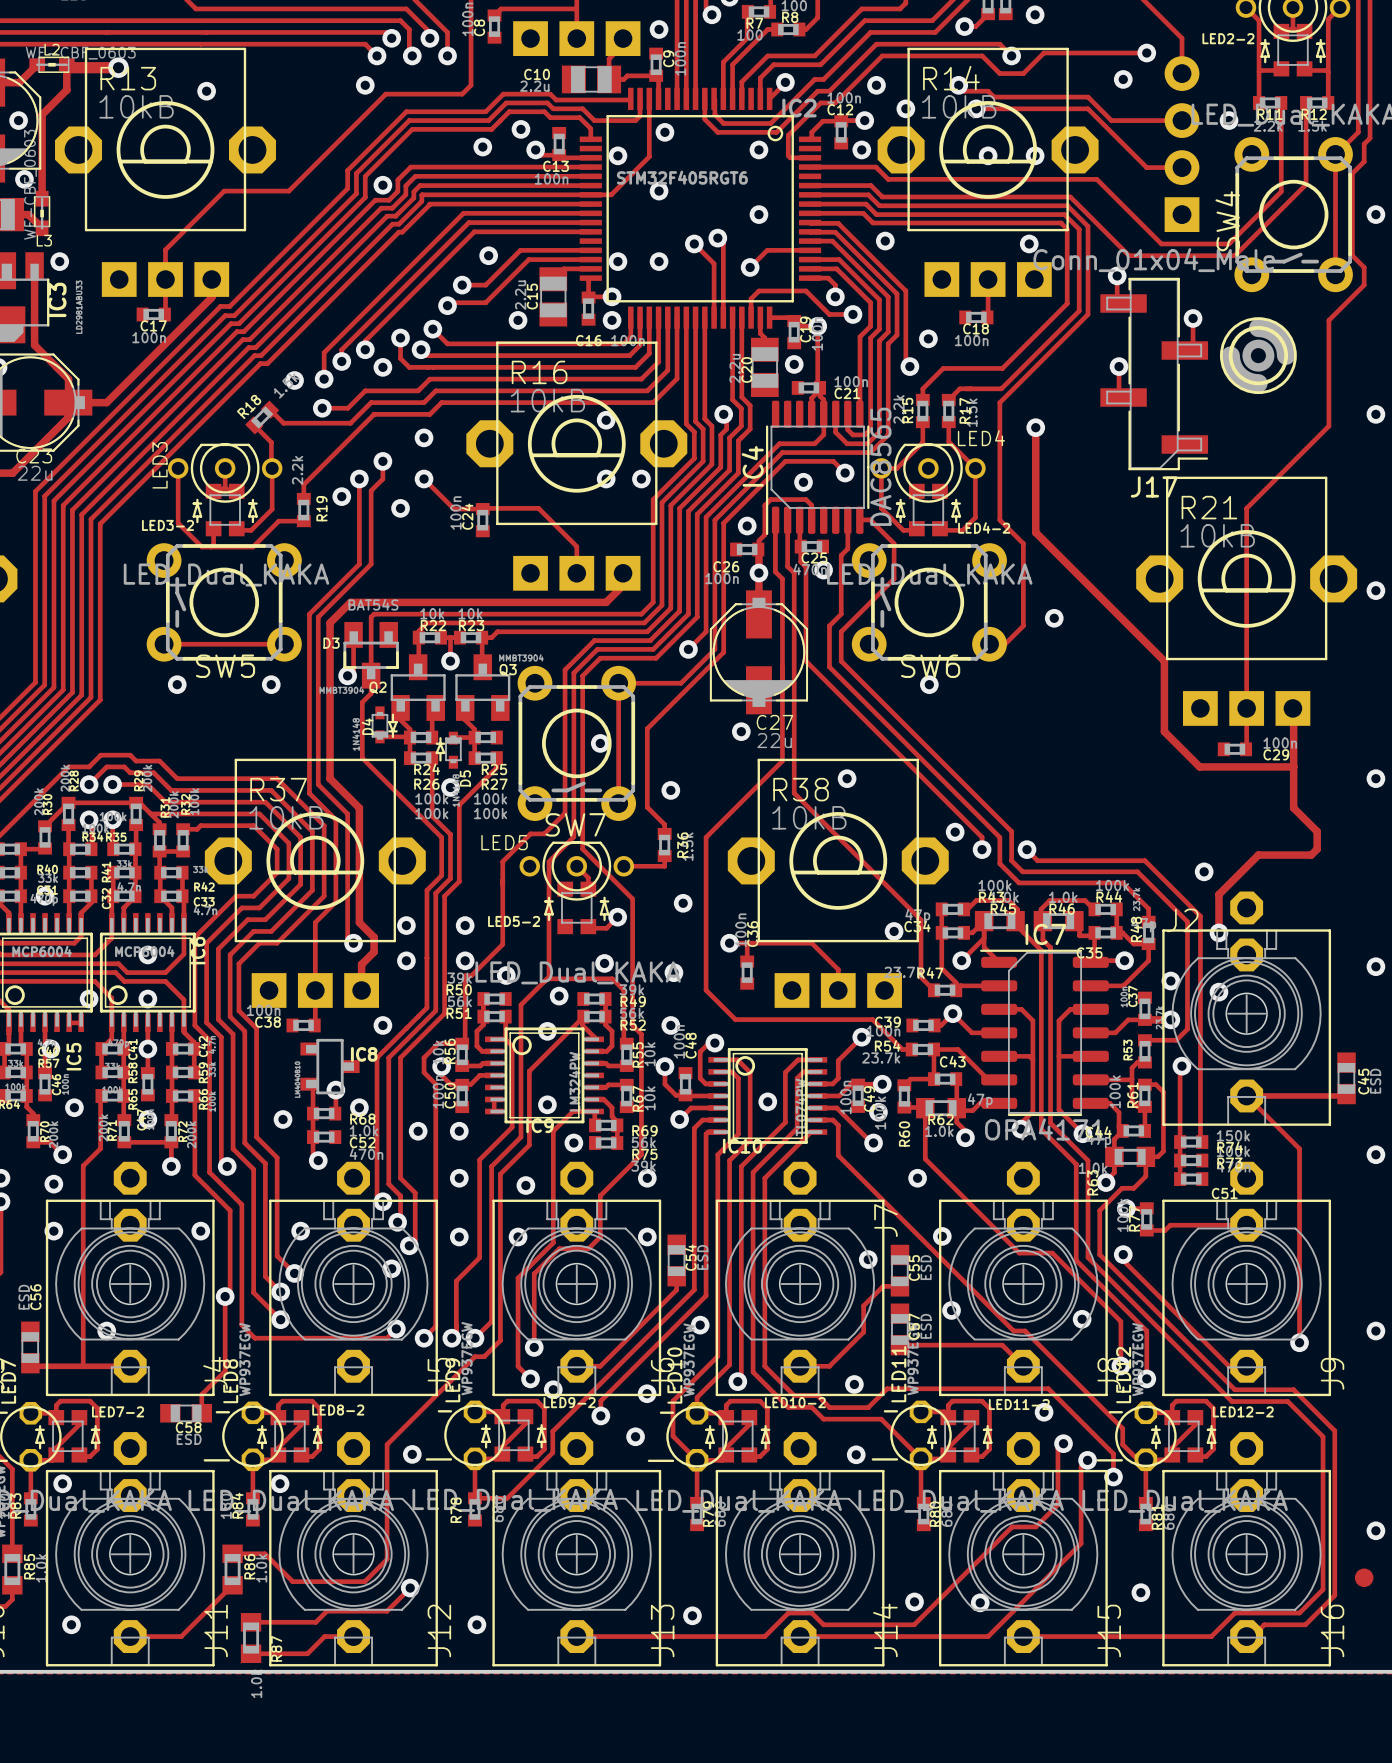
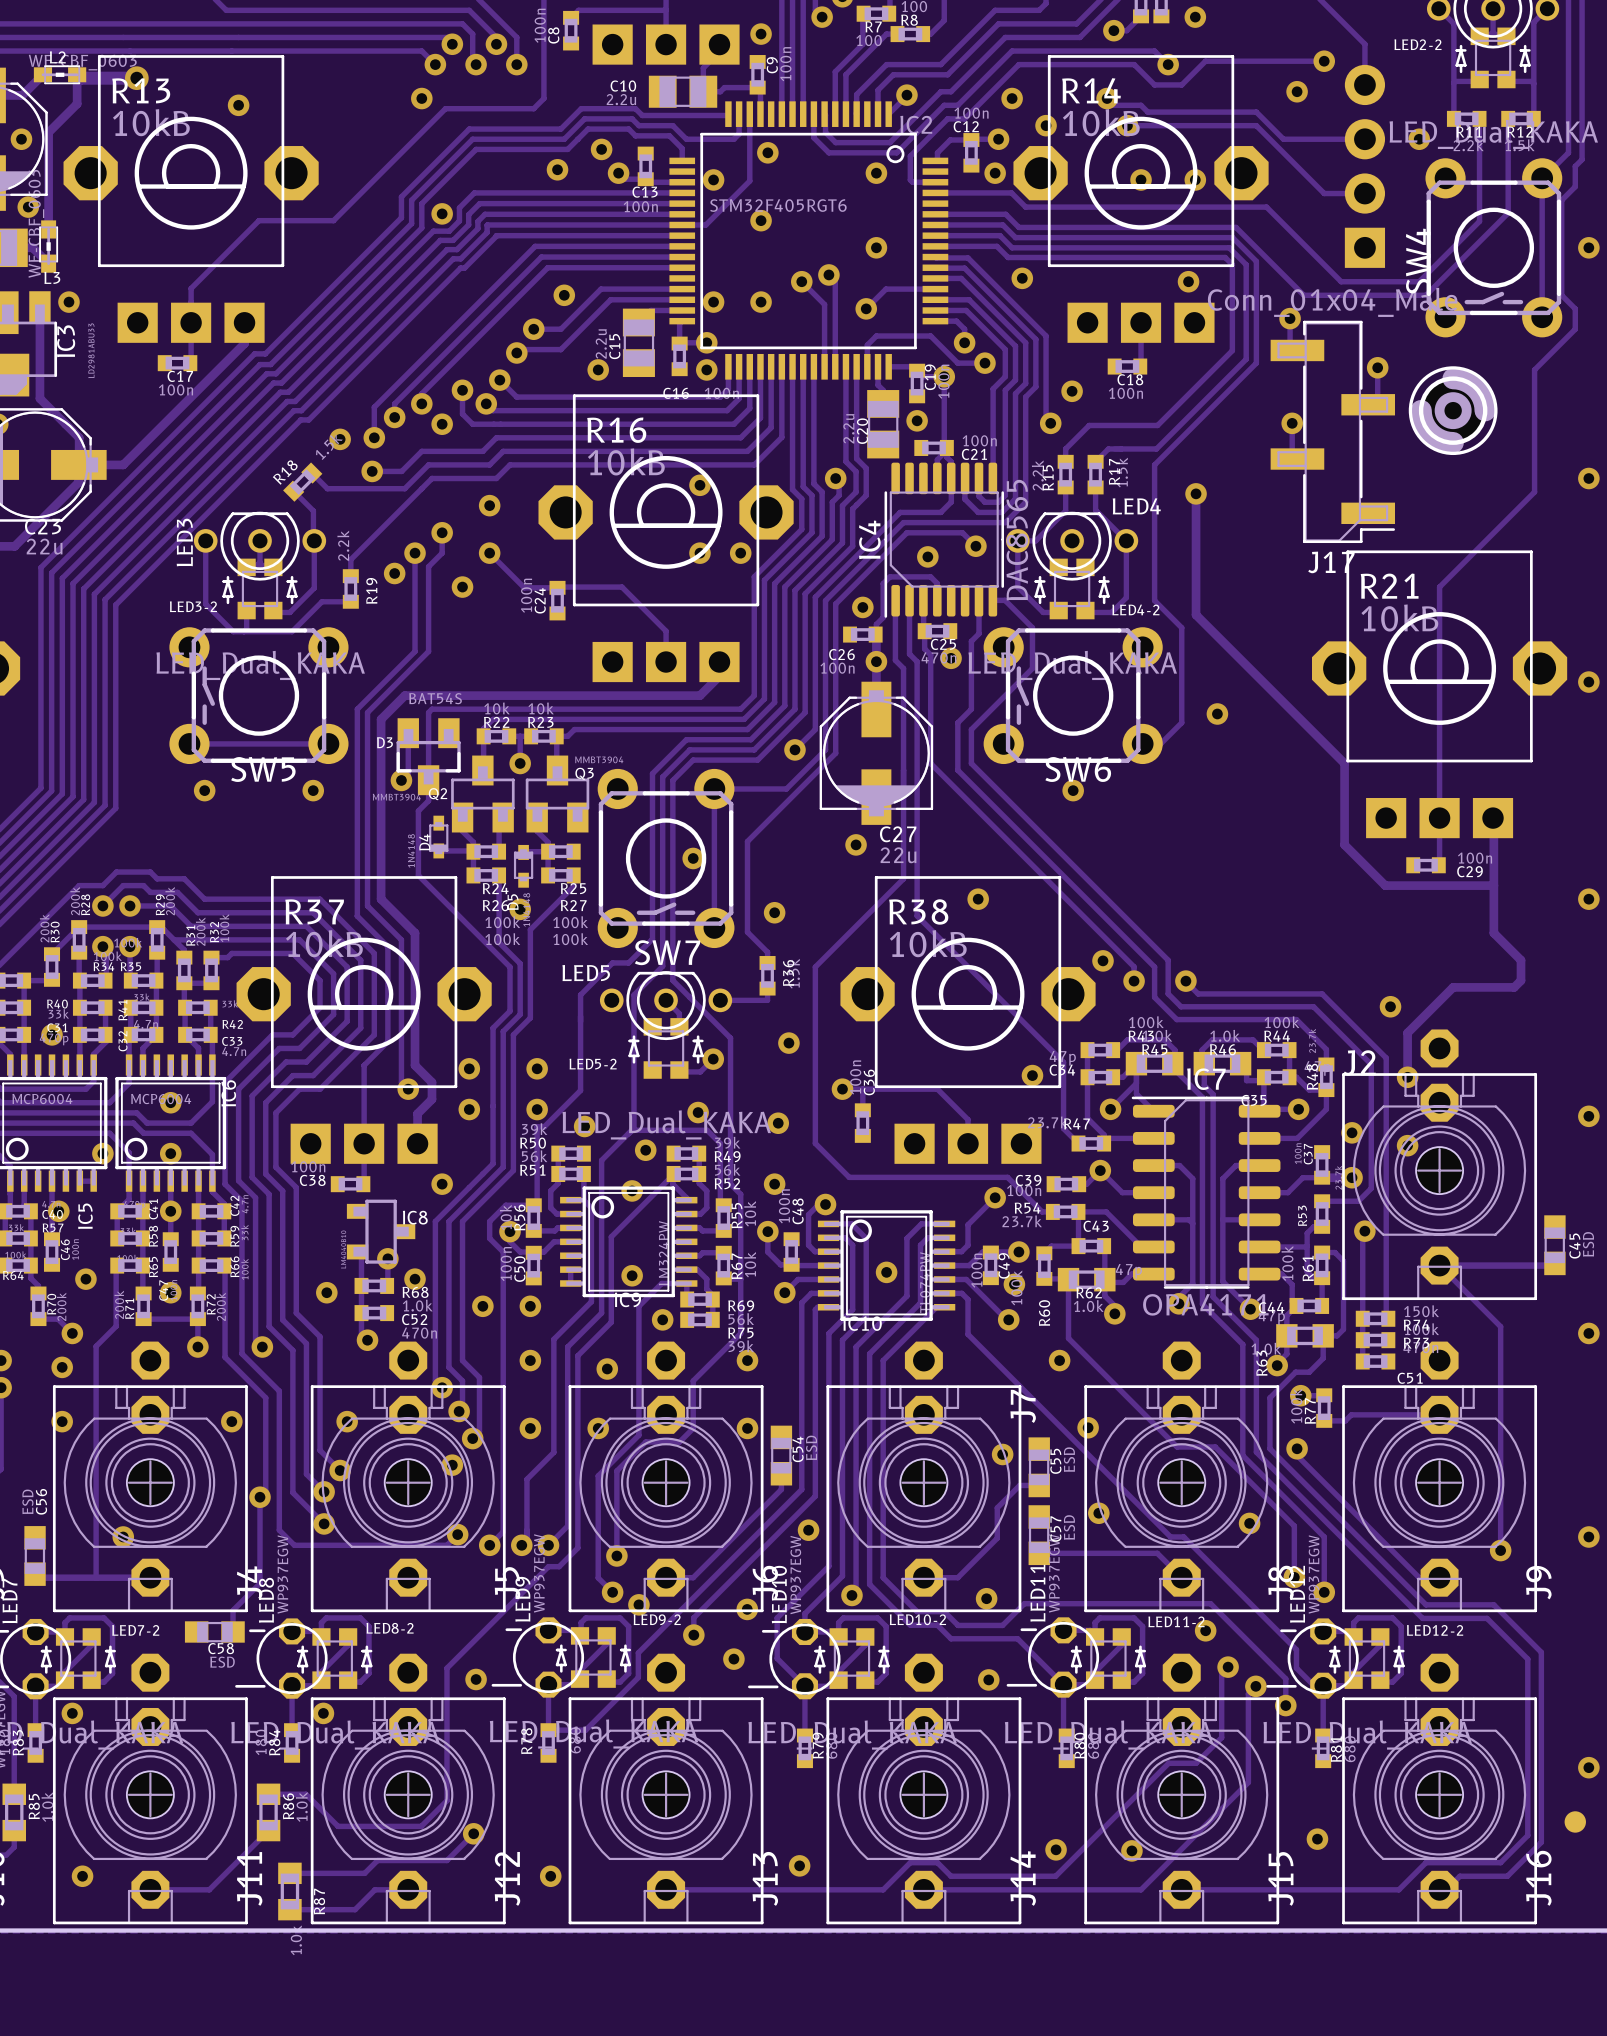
D4 footprint: [371, 706, 398, 744] -> [429, 815, 449, 859]
D5 footprint: [435, 731, 462, 769] -> [513, 844, 534, 888]

